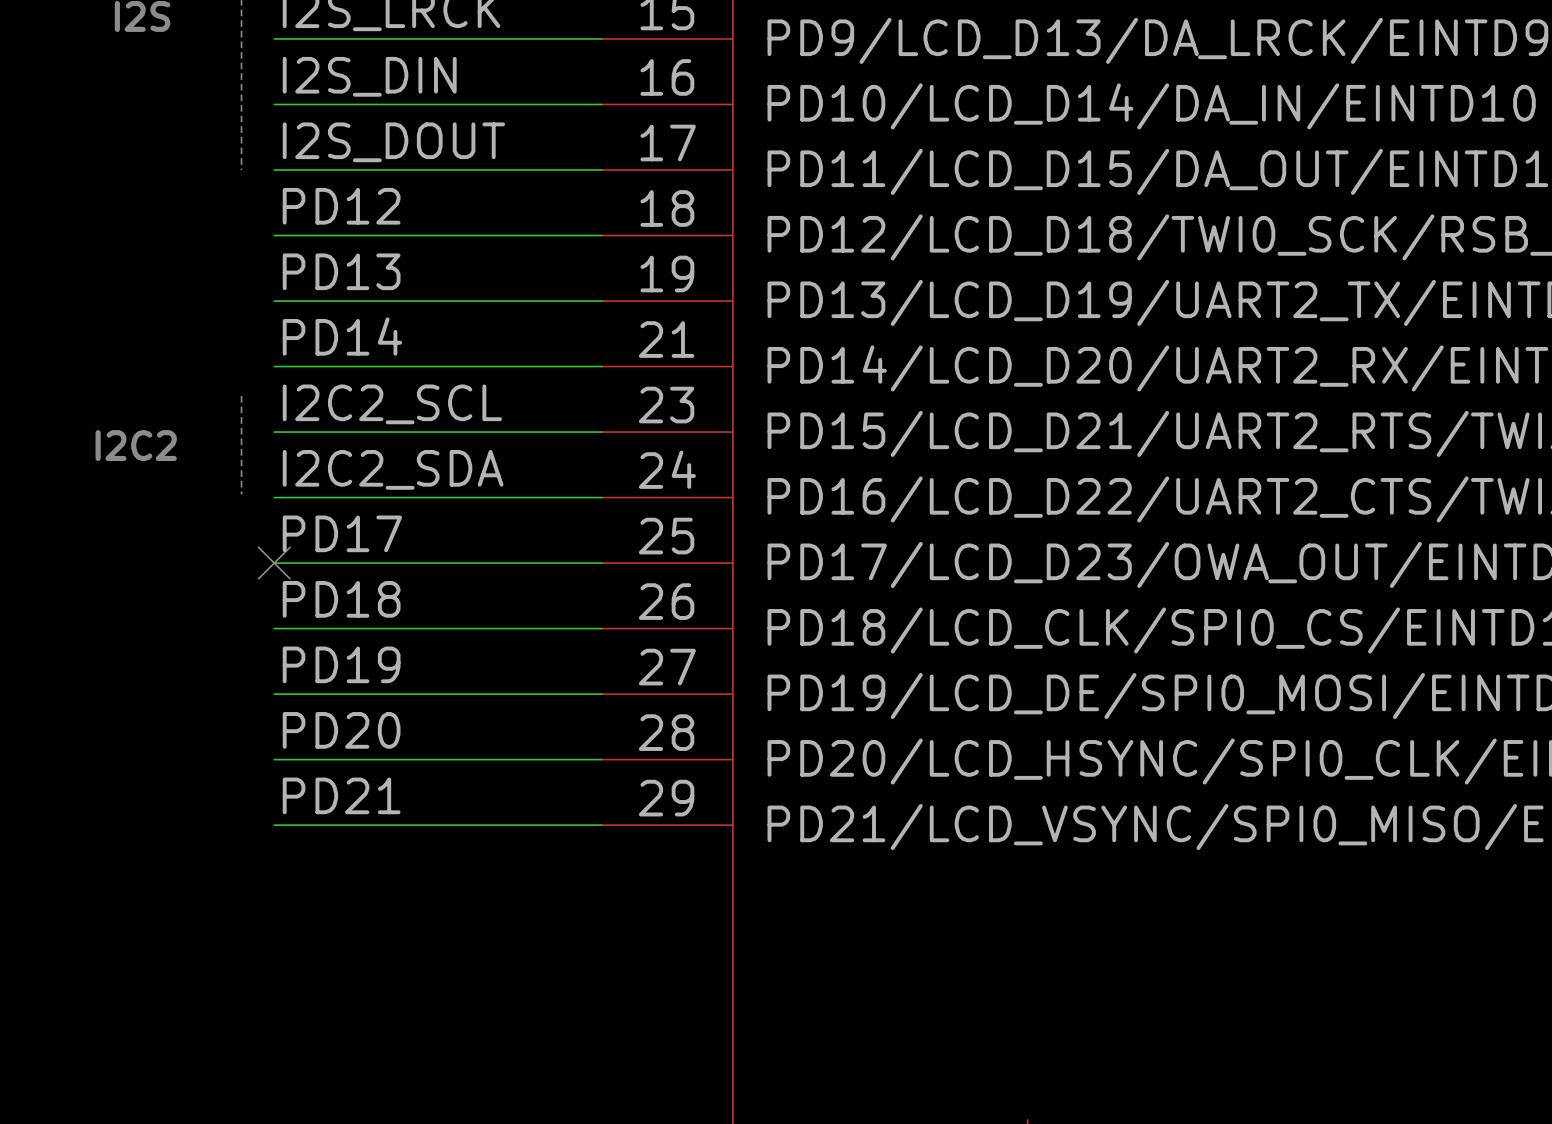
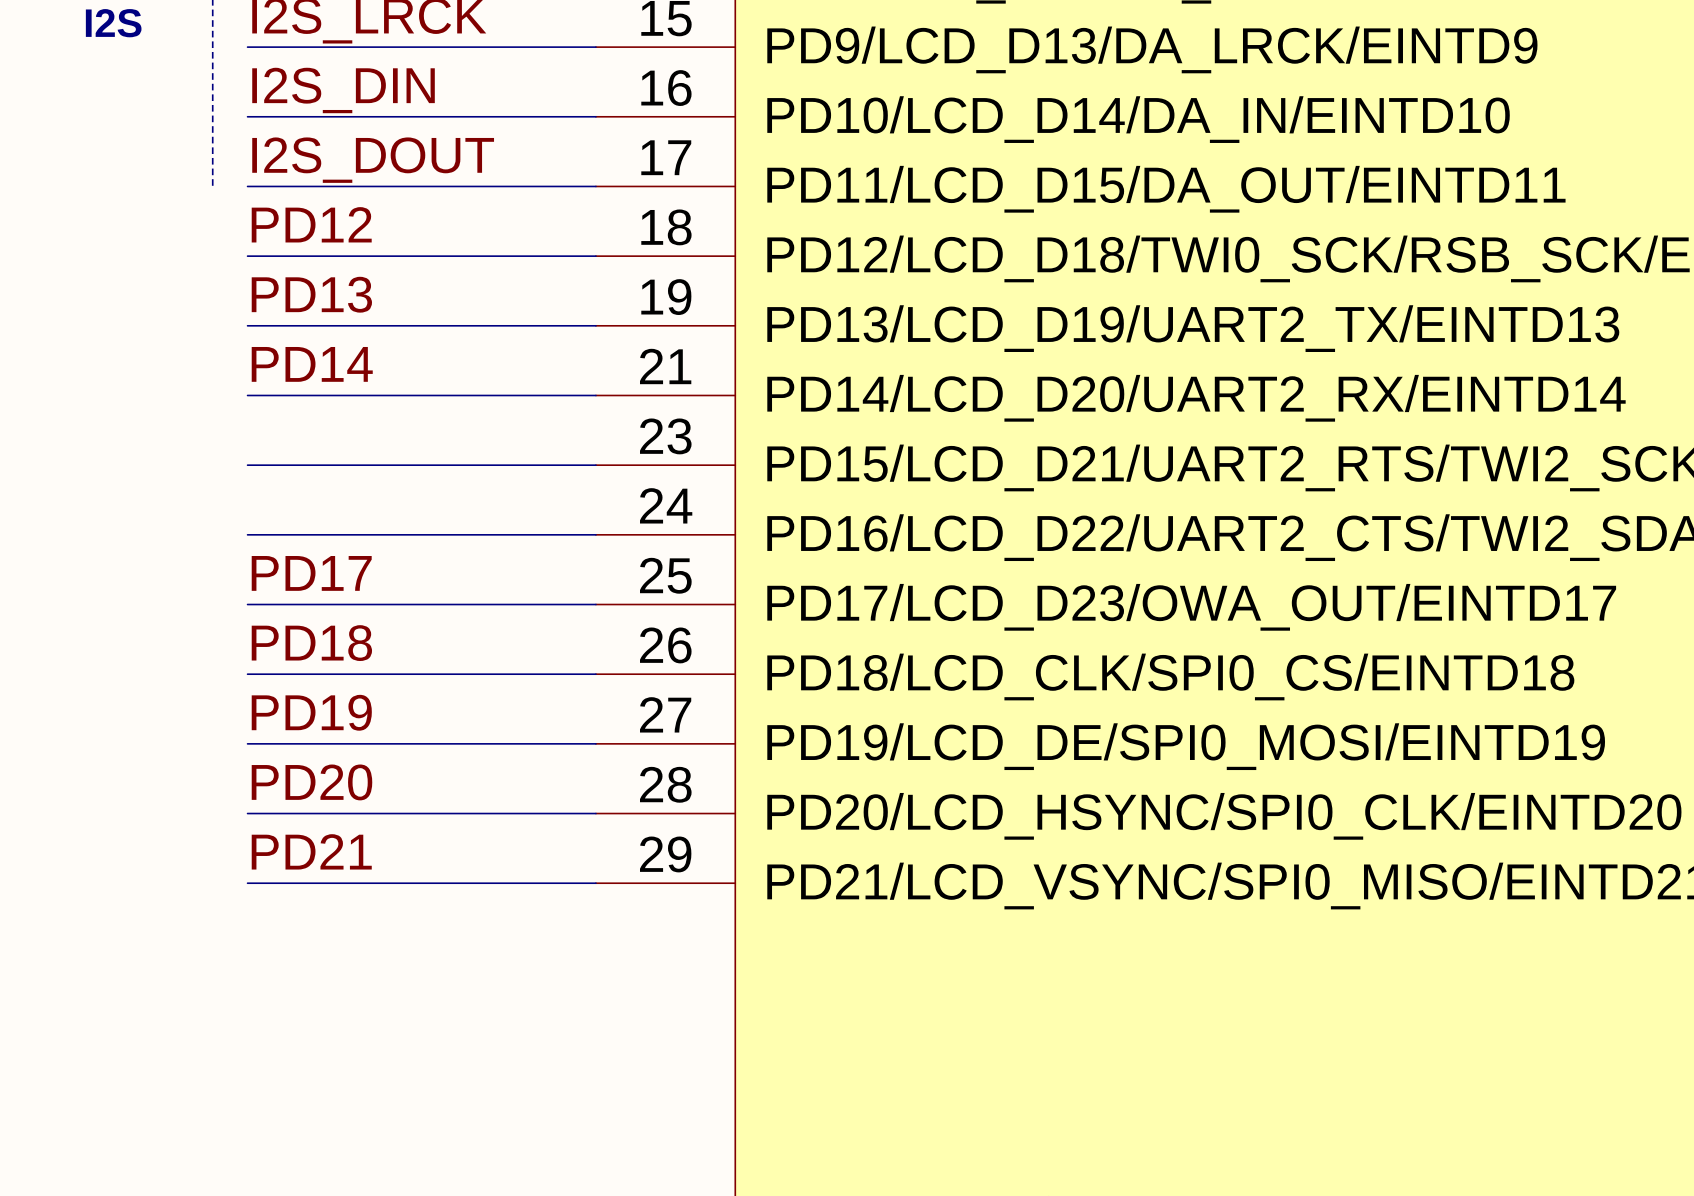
line: (241, 396) (241, 494) -> none
label: I2C2_SCL (392, 404) -> none
text: I2C2 (136, 445) -> none
label: I2C2_SDA (393, 469) -> none
no-connect mark: (274, 563) -> none

